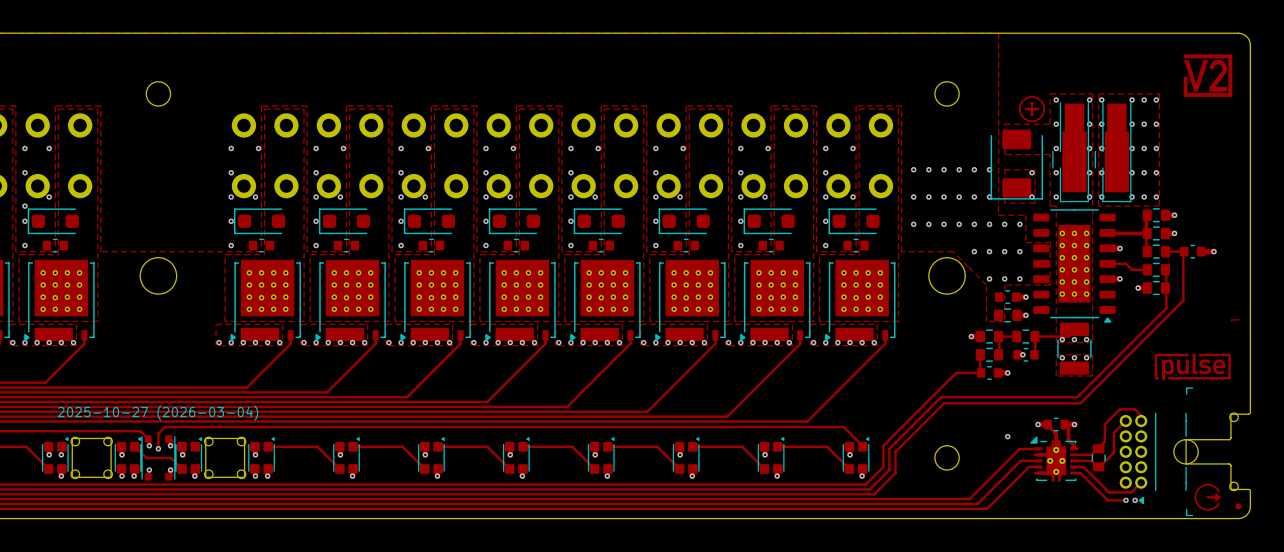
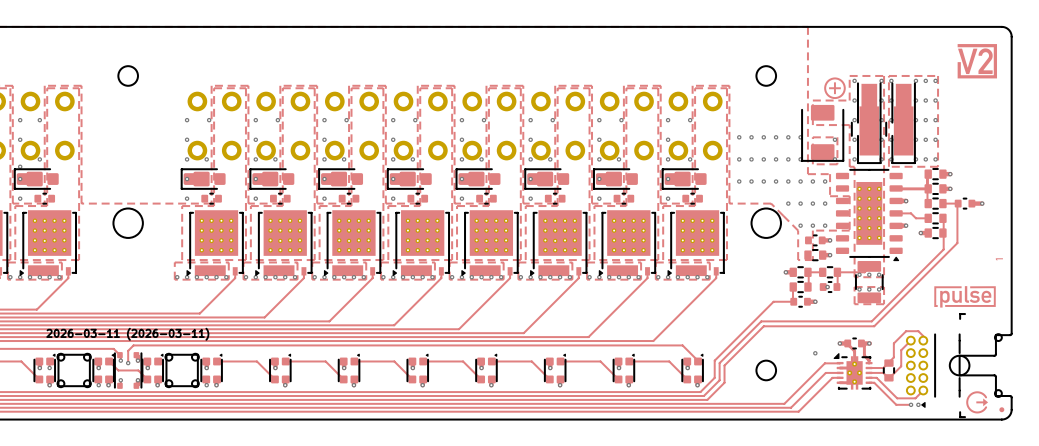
part footprint: [27, 208, 79, 235] -> [14, 168, 59, 190]
part footprint: [234, 208, 286, 235] -> [181, 168, 226, 190]
part footprint: [318, 208, 371, 235] -> [249, 168, 295, 190]
part footprint: [403, 208, 456, 235] -> [318, 168, 364, 190]
part footprint: [488, 208, 541, 235] -> [387, 168, 432, 190]
part footprint: [573, 208, 625, 235] -> [455, 168, 501, 190]
part footprint: [658, 208, 710, 235] -> [524, 168, 570, 190]
part footprint: [743, 208, 795, 235] -> [593, 168, 638, 190]
part footprint: [828, 208, 880, 235] -> [662, 168, 707, 190]
drawing shape: [57, 405, 259, 421] -> [46, 328, 209, 341]

